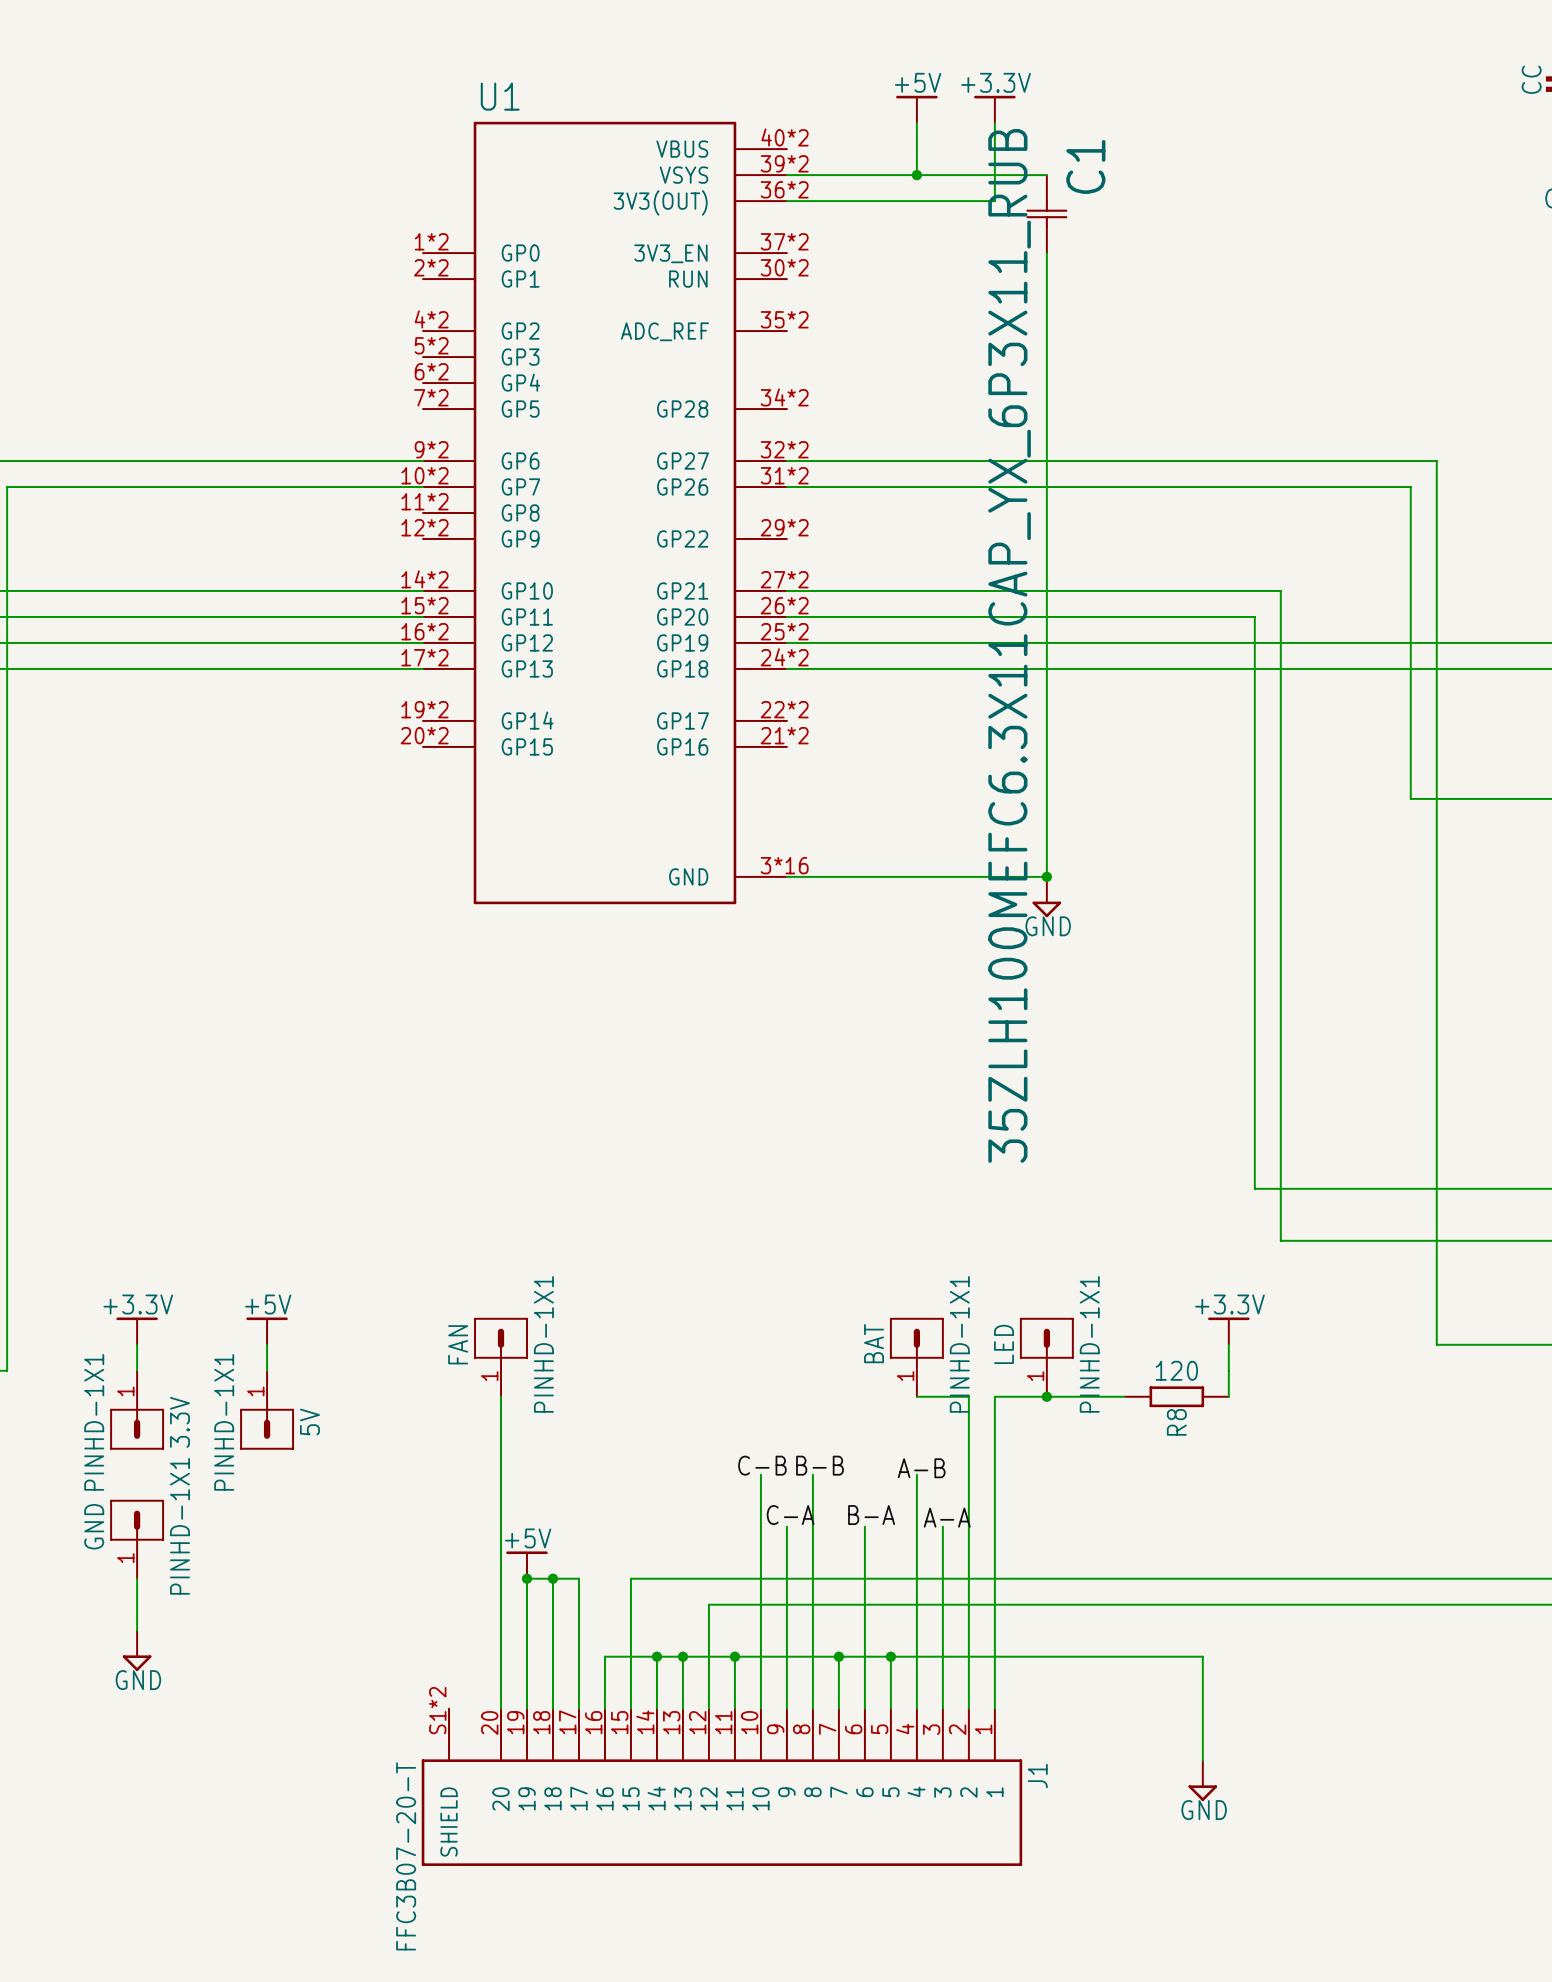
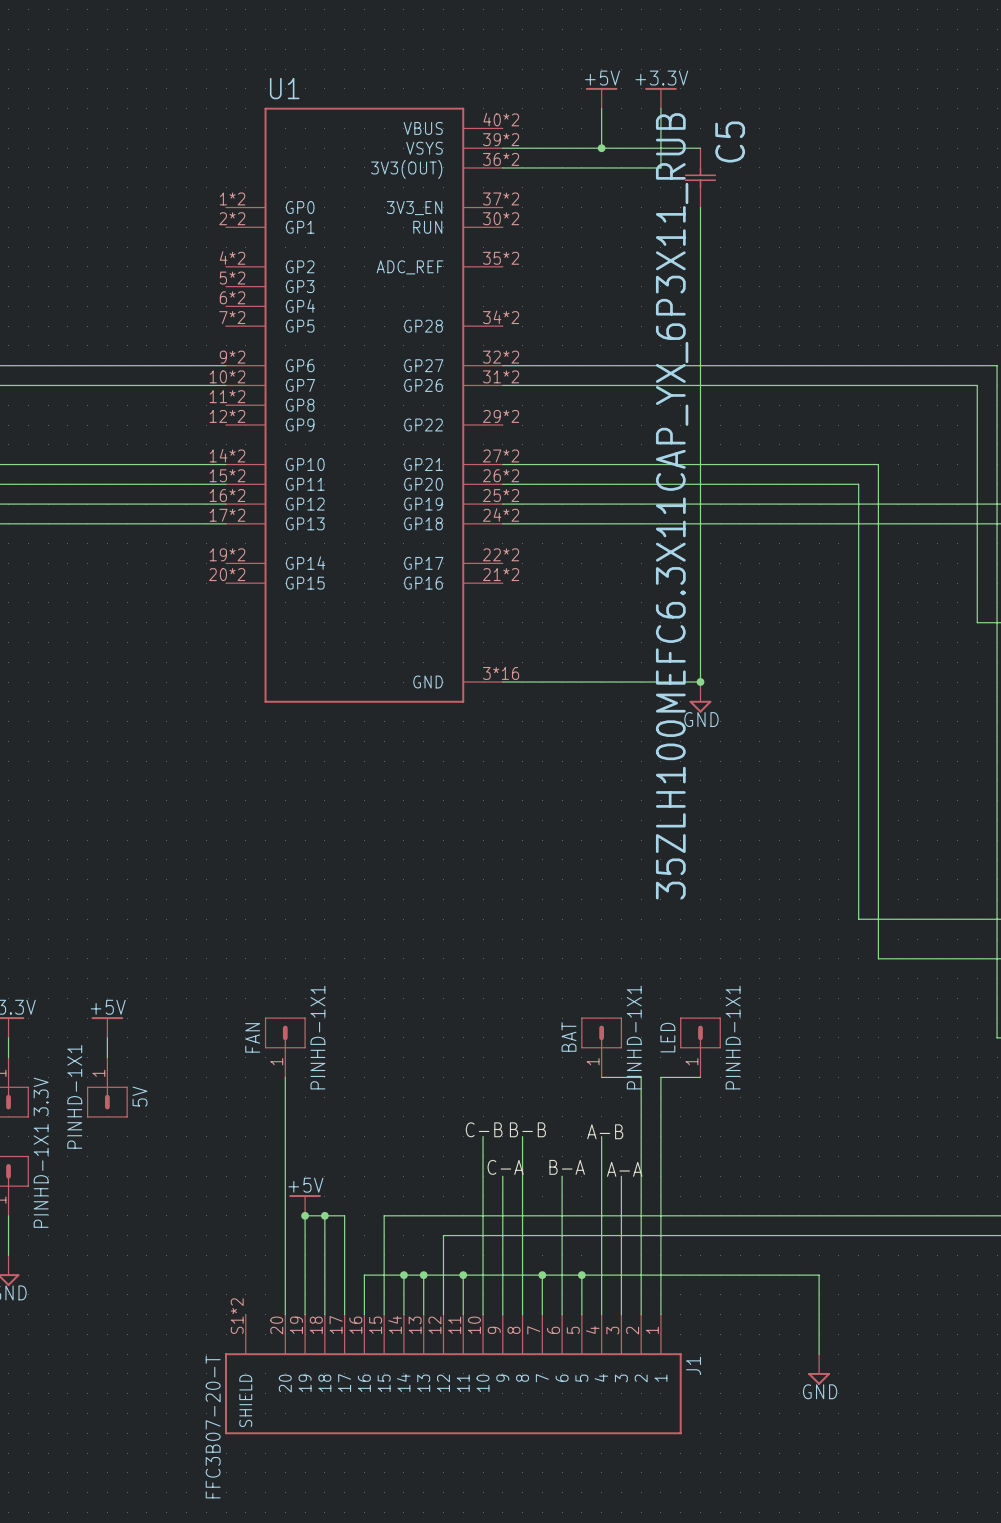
C1 name: C1 (1085, 166) -> C5 (730, 142)
power symbol: +3.3V (1228, 1331) -> none
wire: (1228, 1344) (1228, 1396) -> none
wire: (1046, 1396) (1124, 1396) -> none
junction: (1046, 1396) -> none
R8: 120 (1176, 1396) -> none

